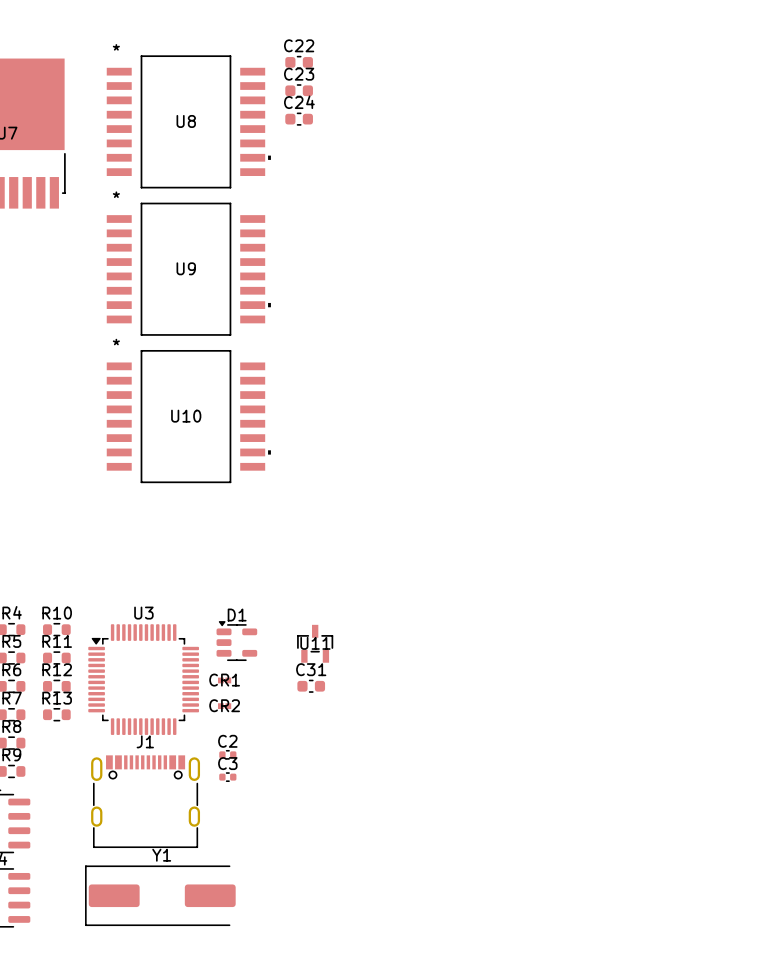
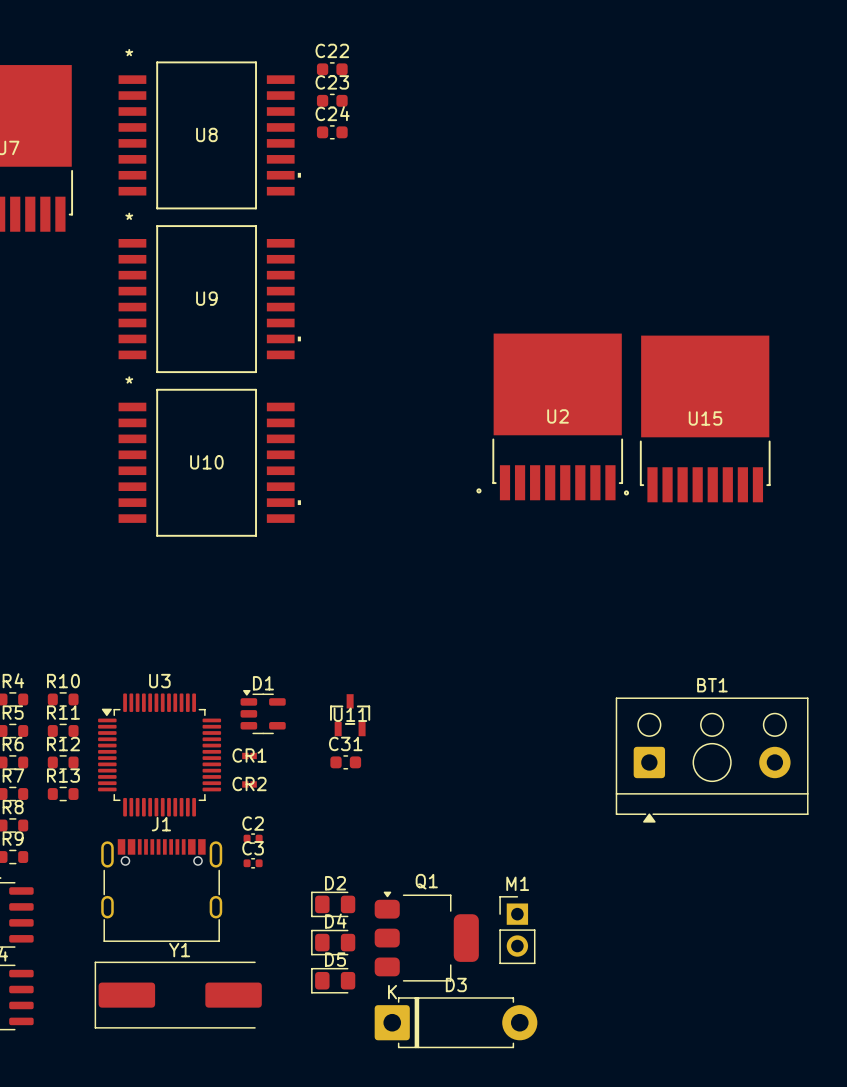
U2: none -> (549, 416)
U15: none -> (697, 418)
BT1: none -> (712, 760)
D2: none -> (333, 904)
M1: none -> (517, 930)
Q1: none -> (426, 936)
D4: none -> (333, 942)
D5: none -> (333, 980)
D3: none -> (456, 1022)

